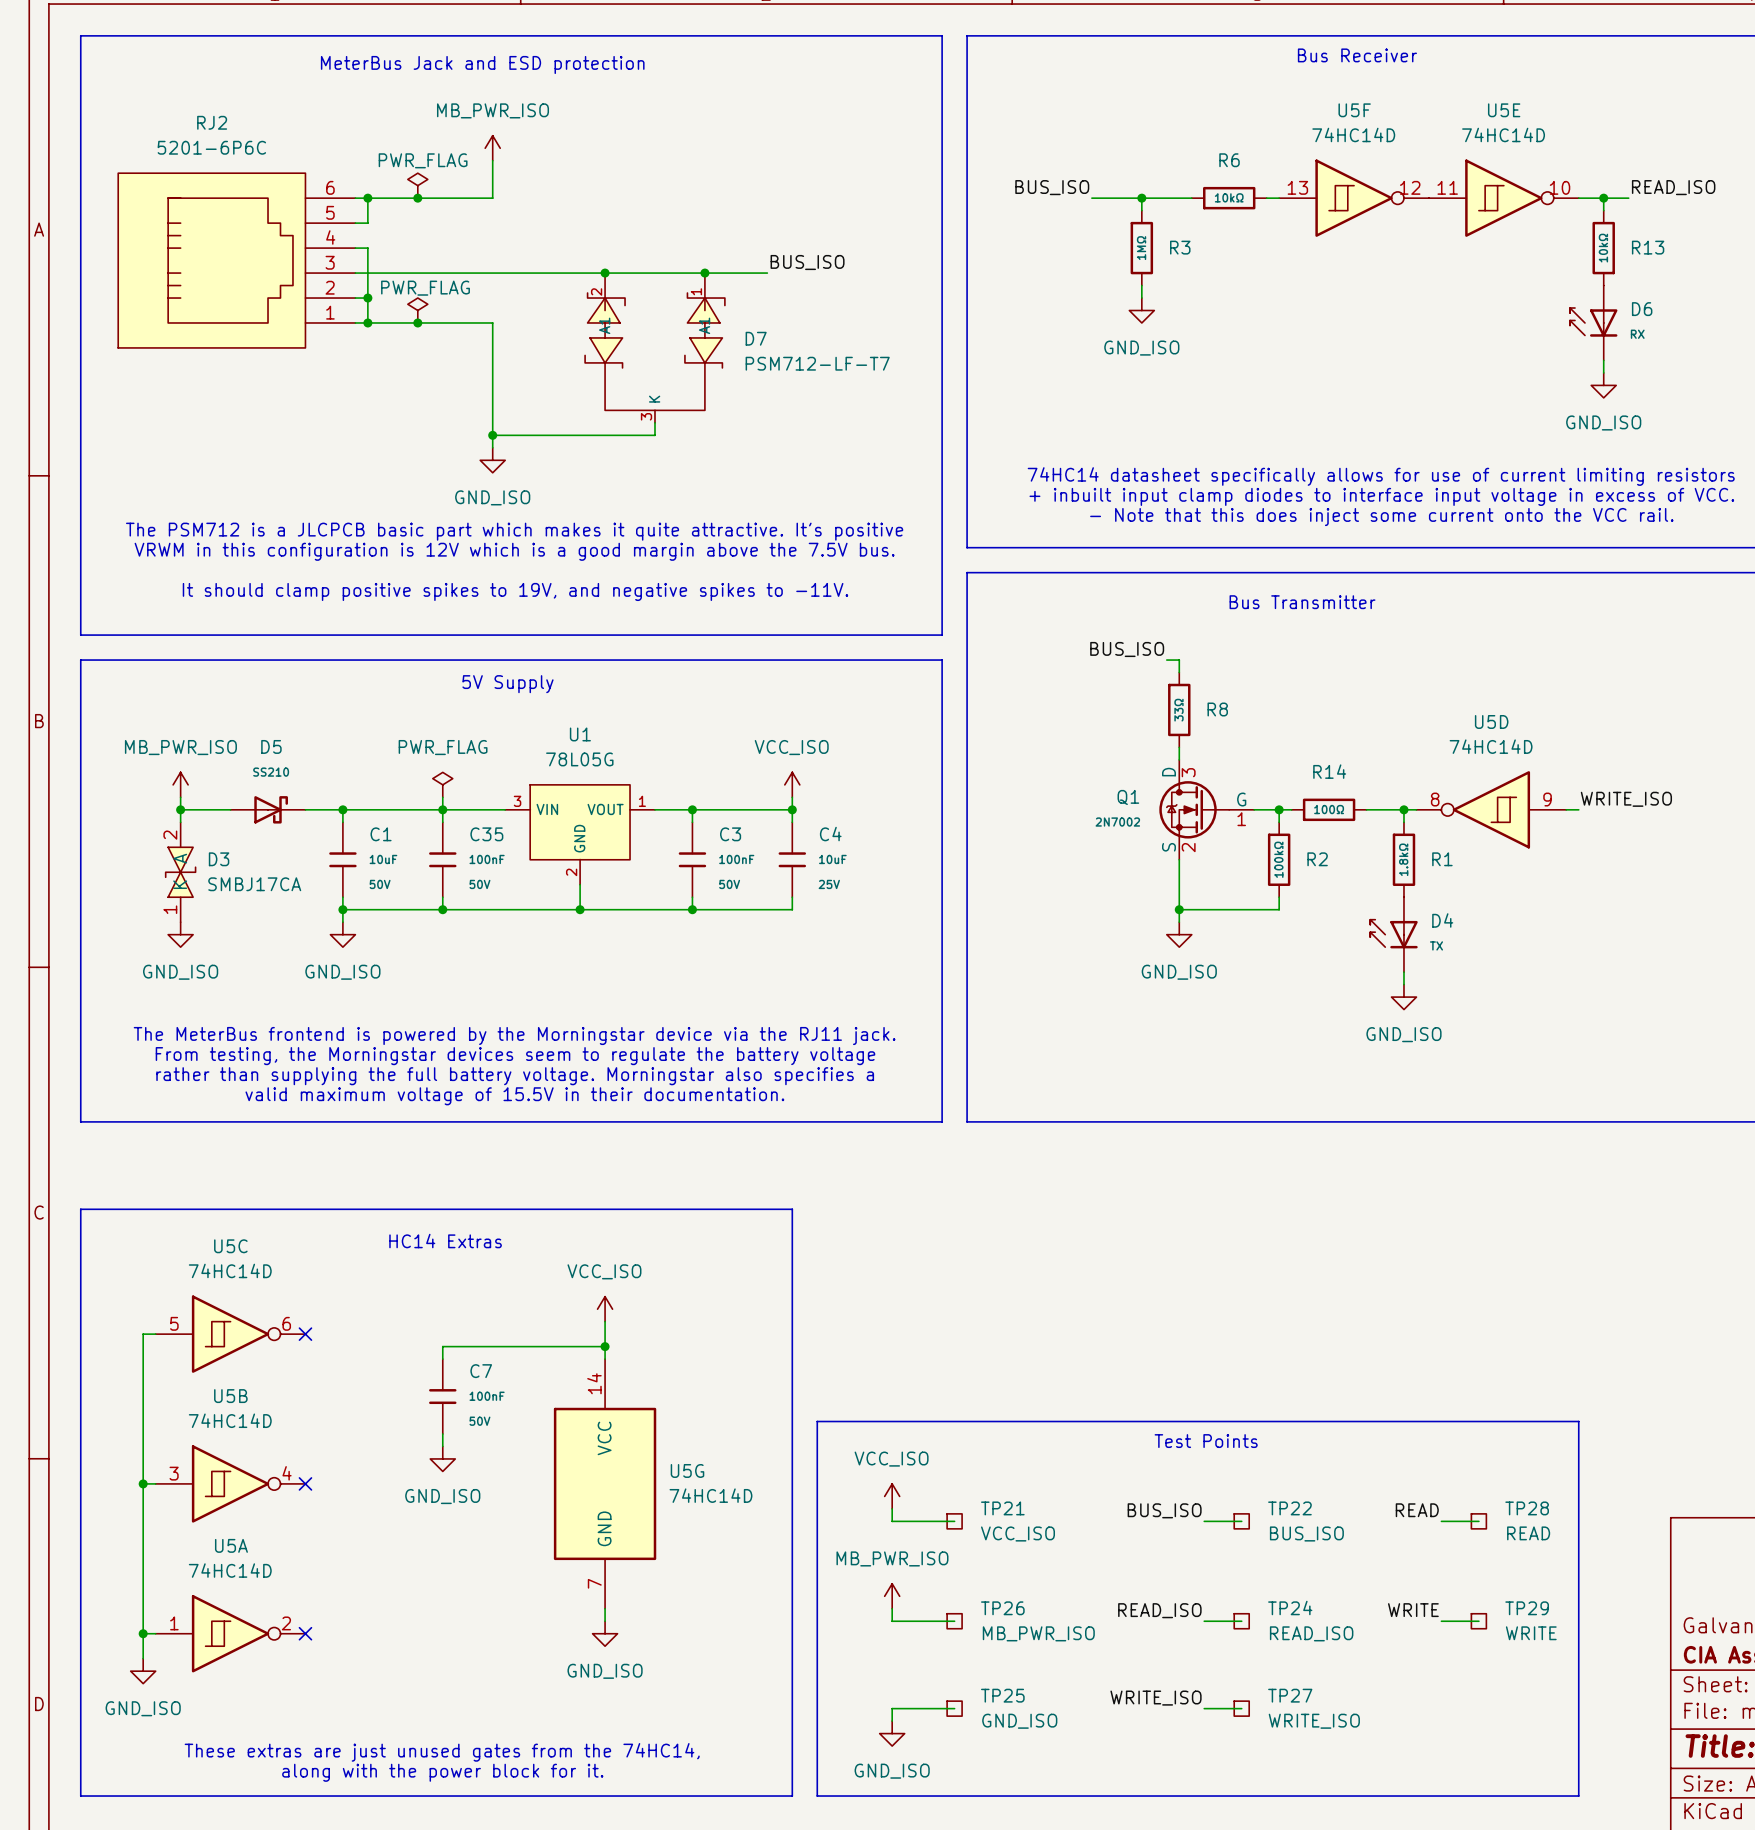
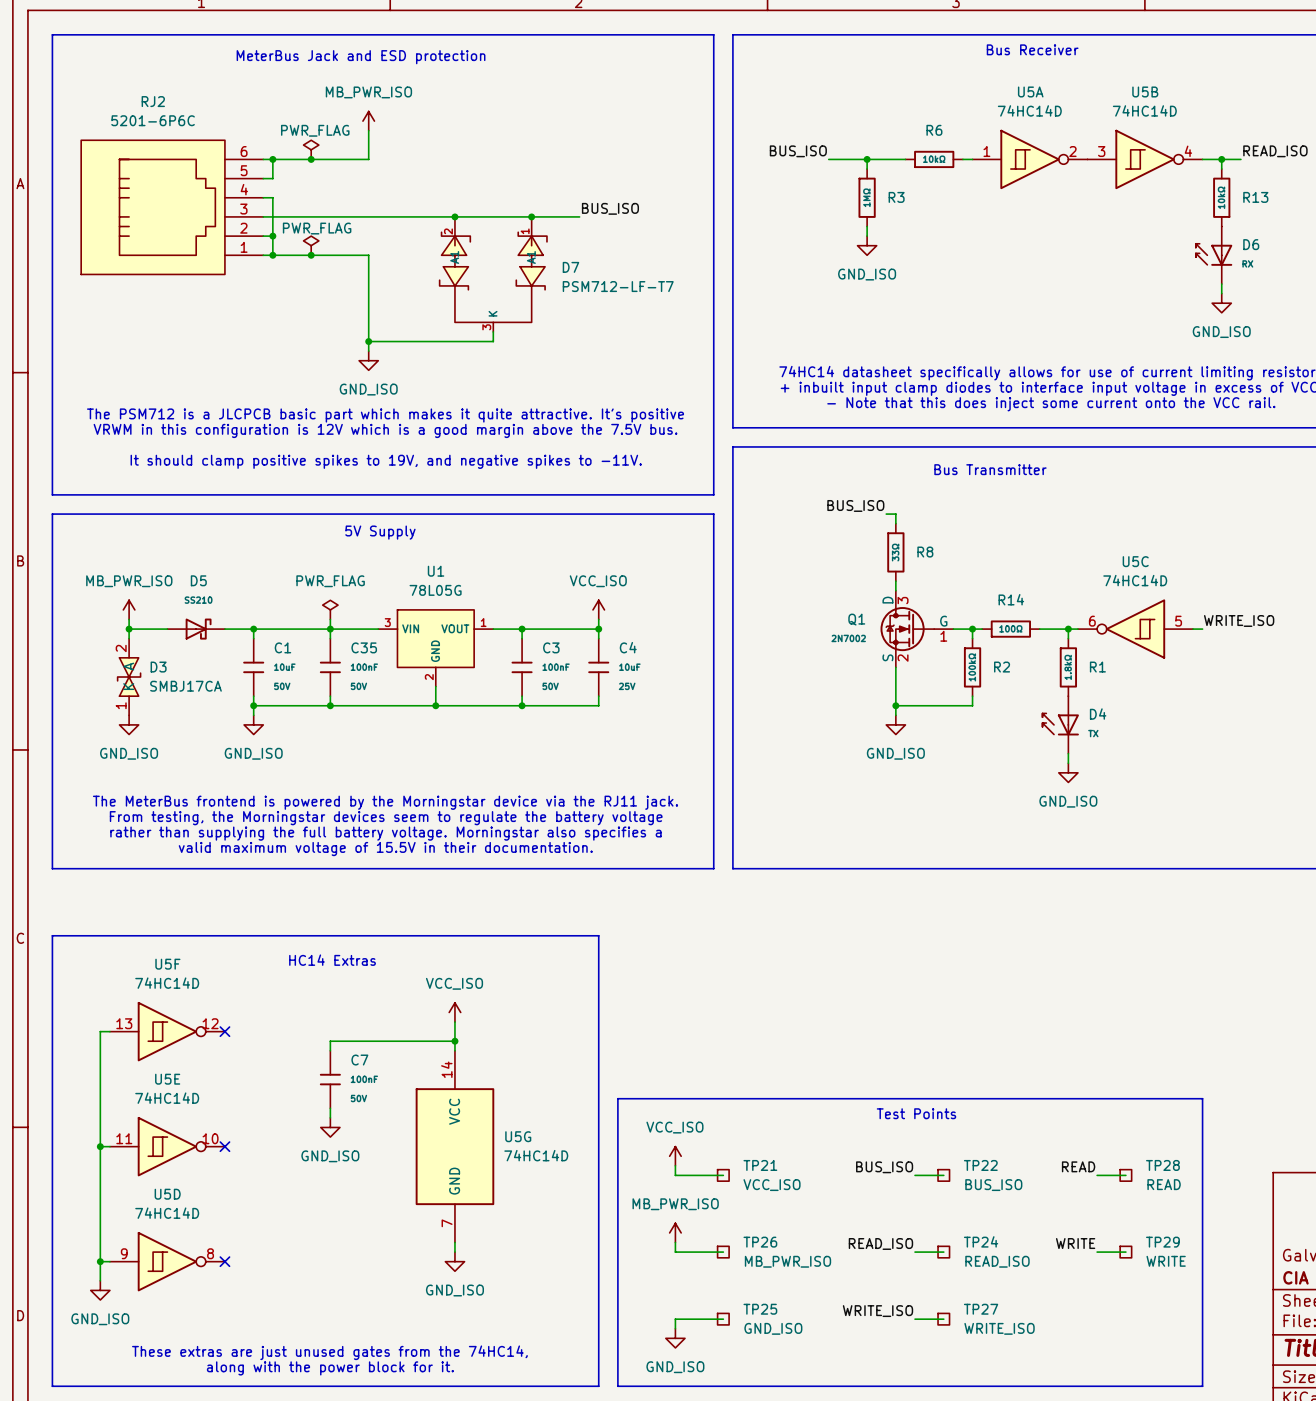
U5F position: (1354, 198) -> (167, 1031)
U5E position: (1503, 198) -> (167, 1146)
U5D rotation: 0° (1491, 809) -> 180° (167, 1261)
U5D position: (1491, 809) -> (167, 1261)
U5C rotation: 0° (230, 1334) -> 180° (1135, 629)
U5C position: (230, 1334) -> (1135, 629)
U5B position: (230, 1483) -> (1145, 159)
U5A position: (230, 1633) -> (1030, 159)

